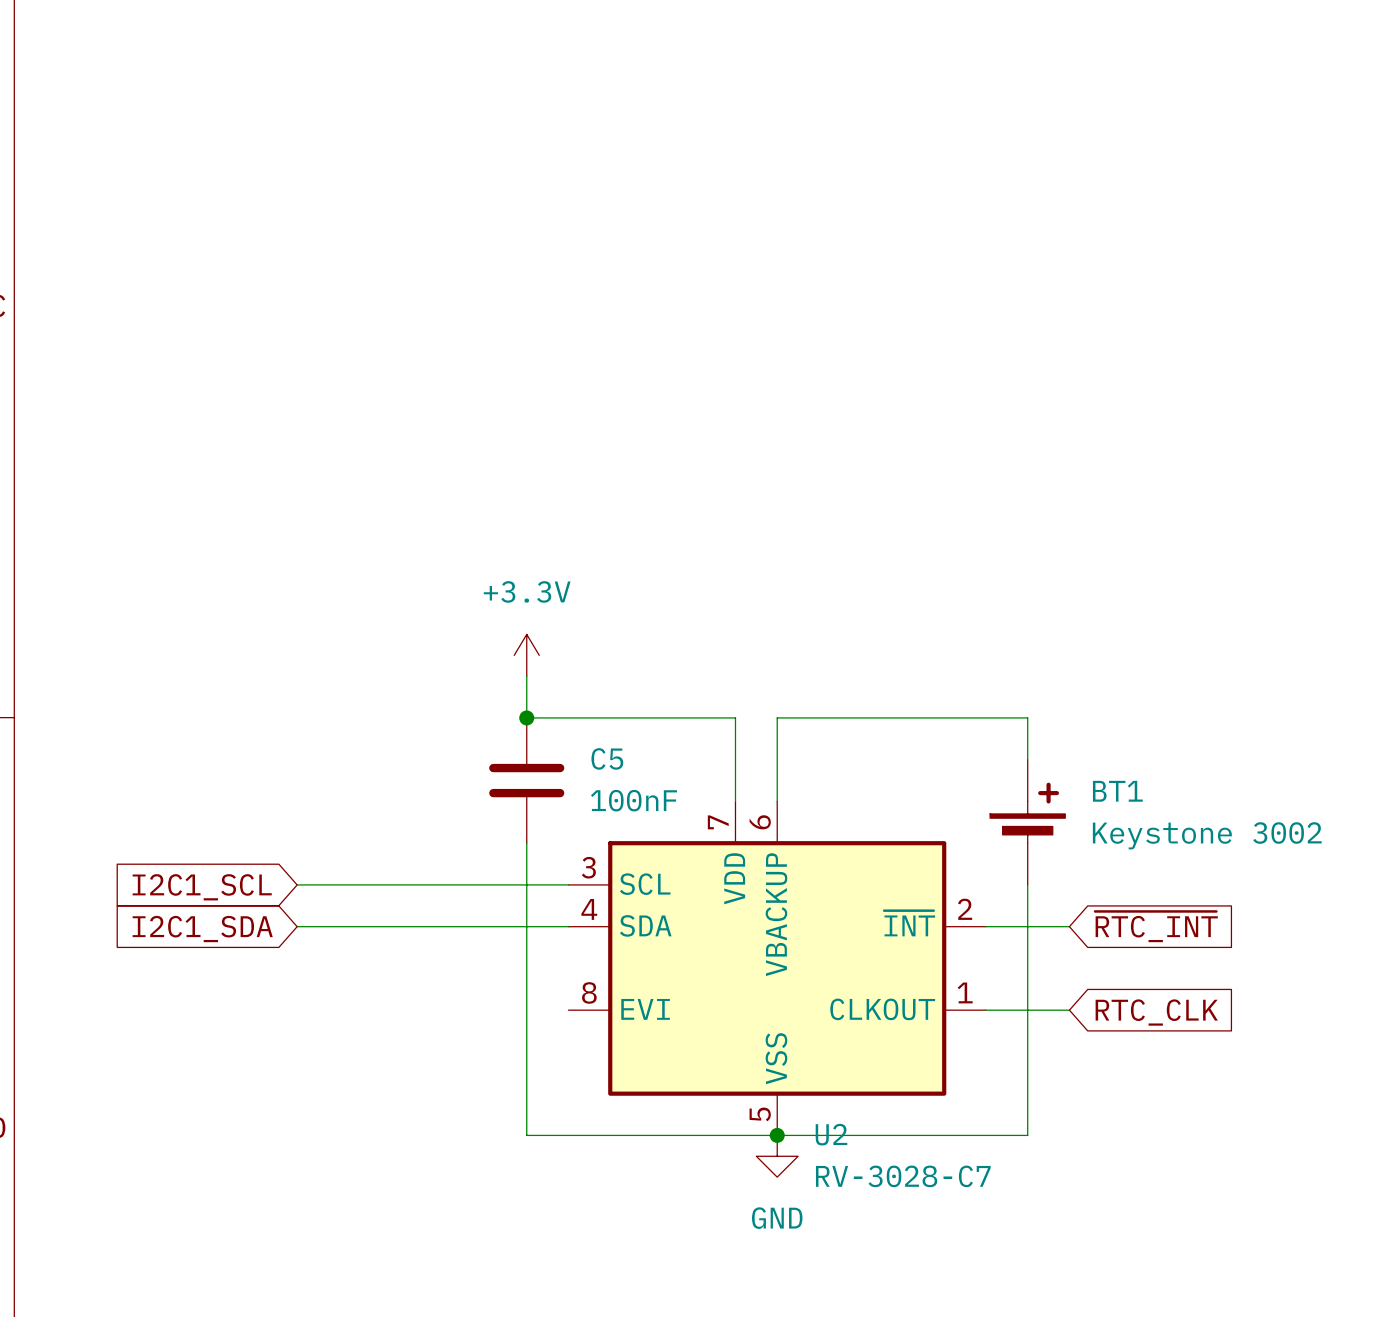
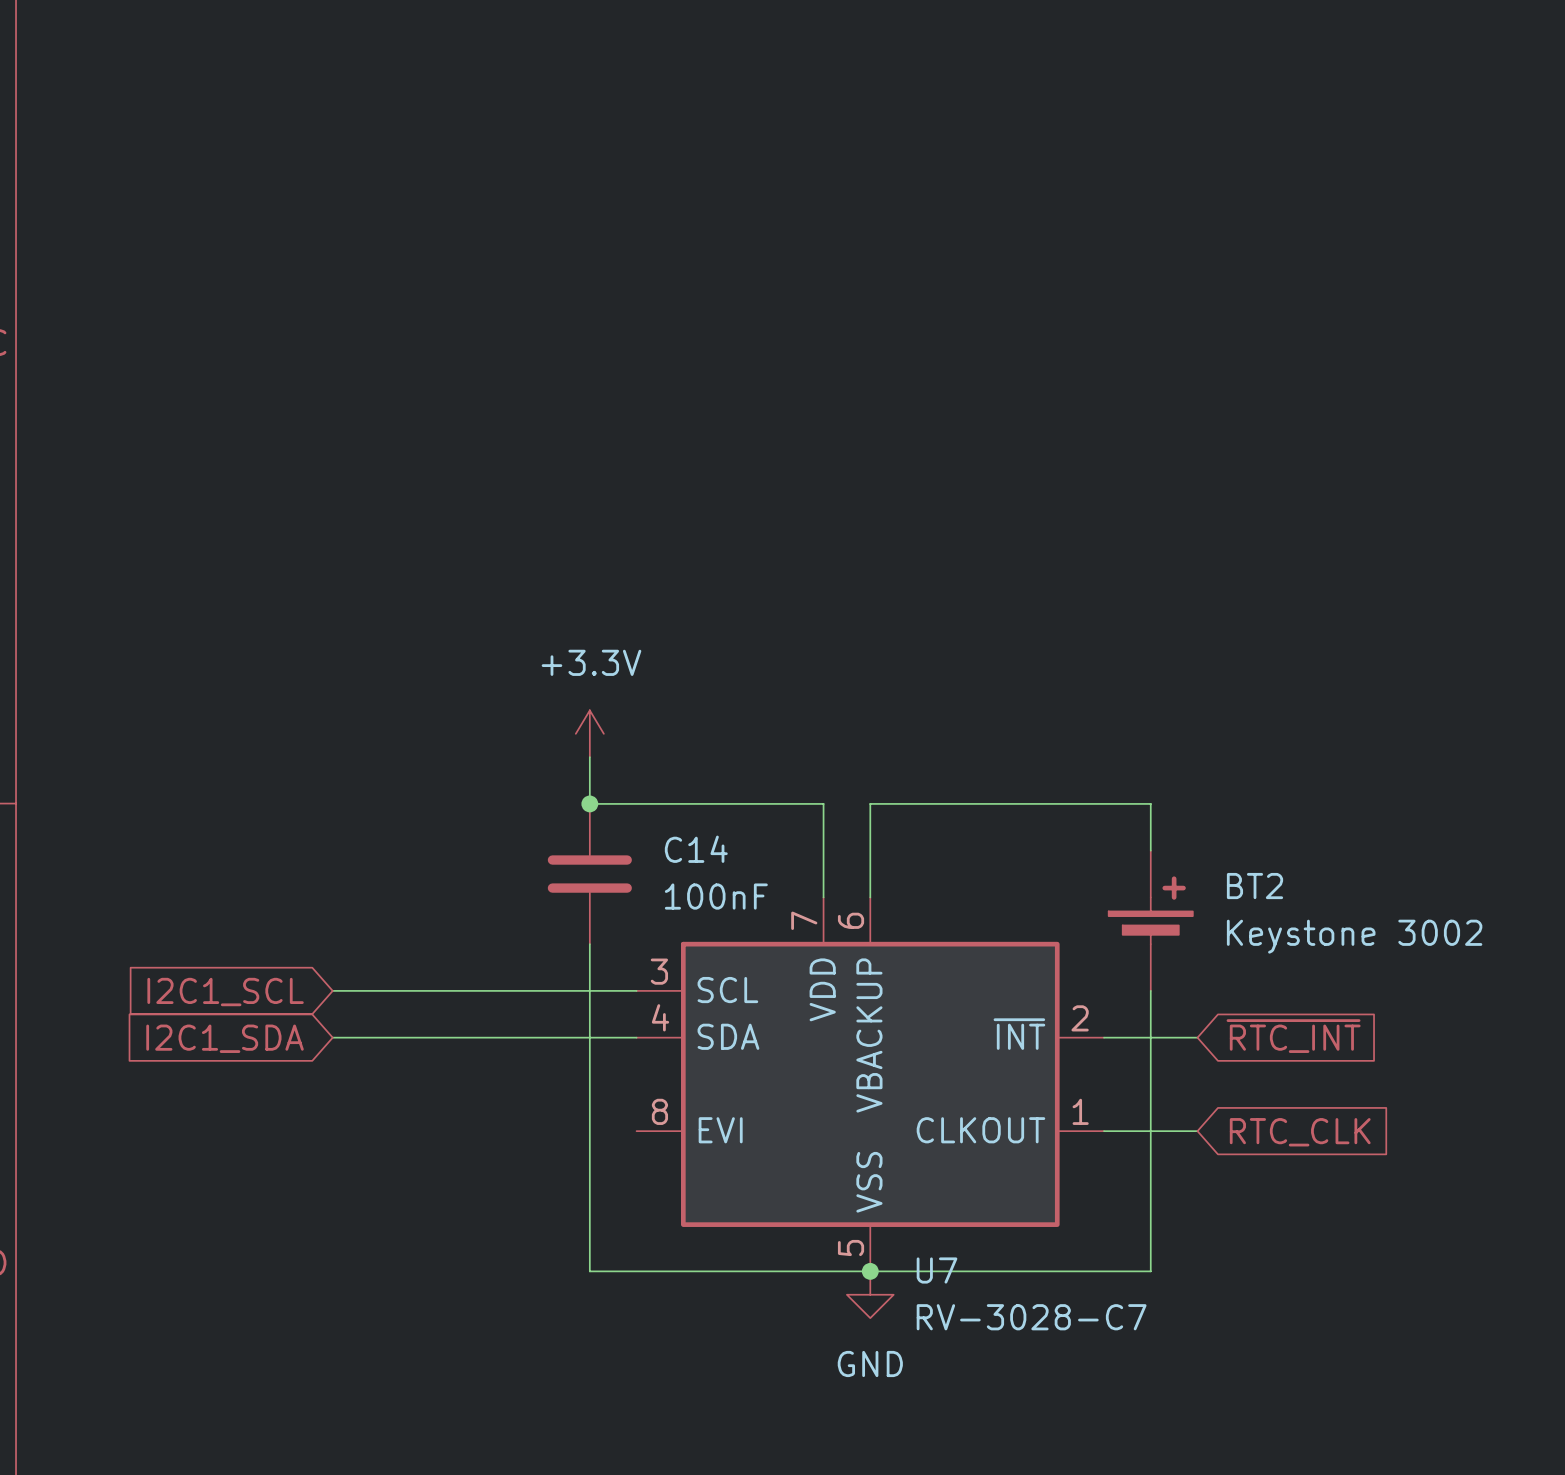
C5 name: C5 (607, 758) -> C14 (696, 849)
BT1 name: BT1 (1117, 791) -> BT2 (1255, 886)
U2 name: U2 (831, 1134) -> U7 (937, 1270)

